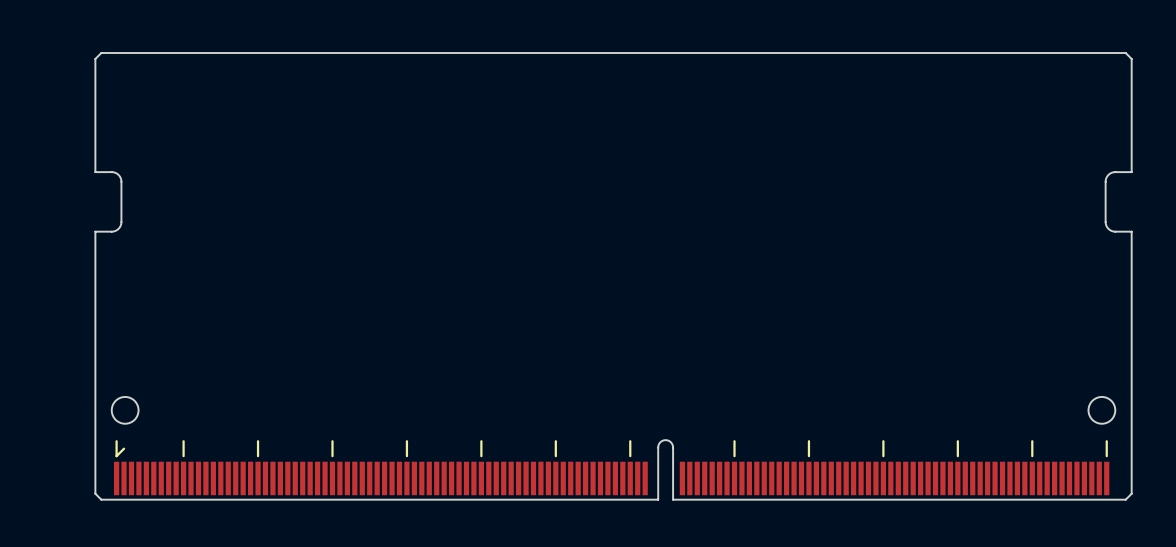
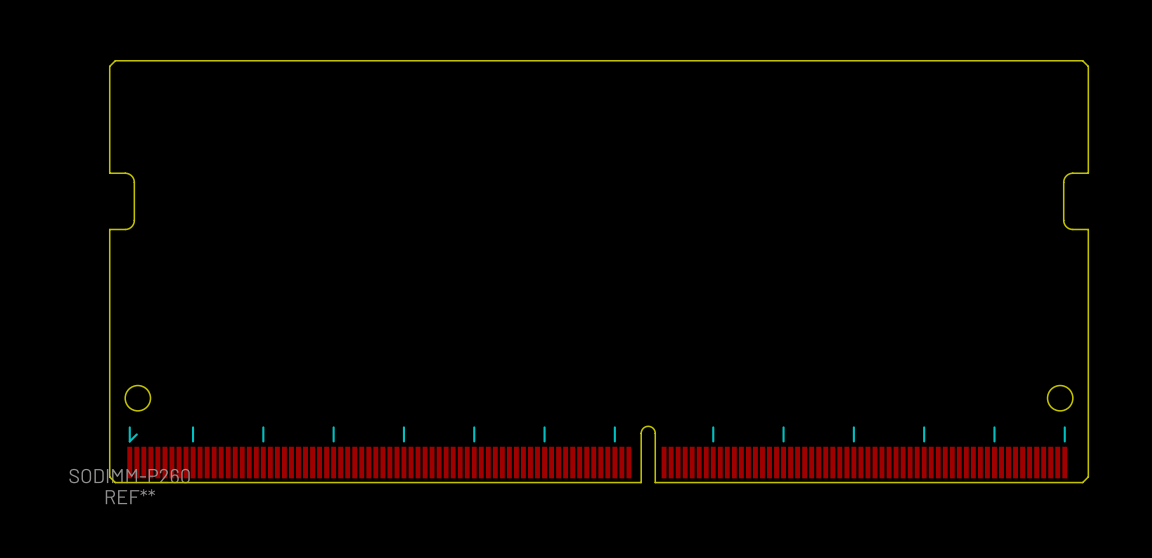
REF** value: none -> SODIMM-P260 (129, 476)
REF** name: none -> REF** (130, 496)

